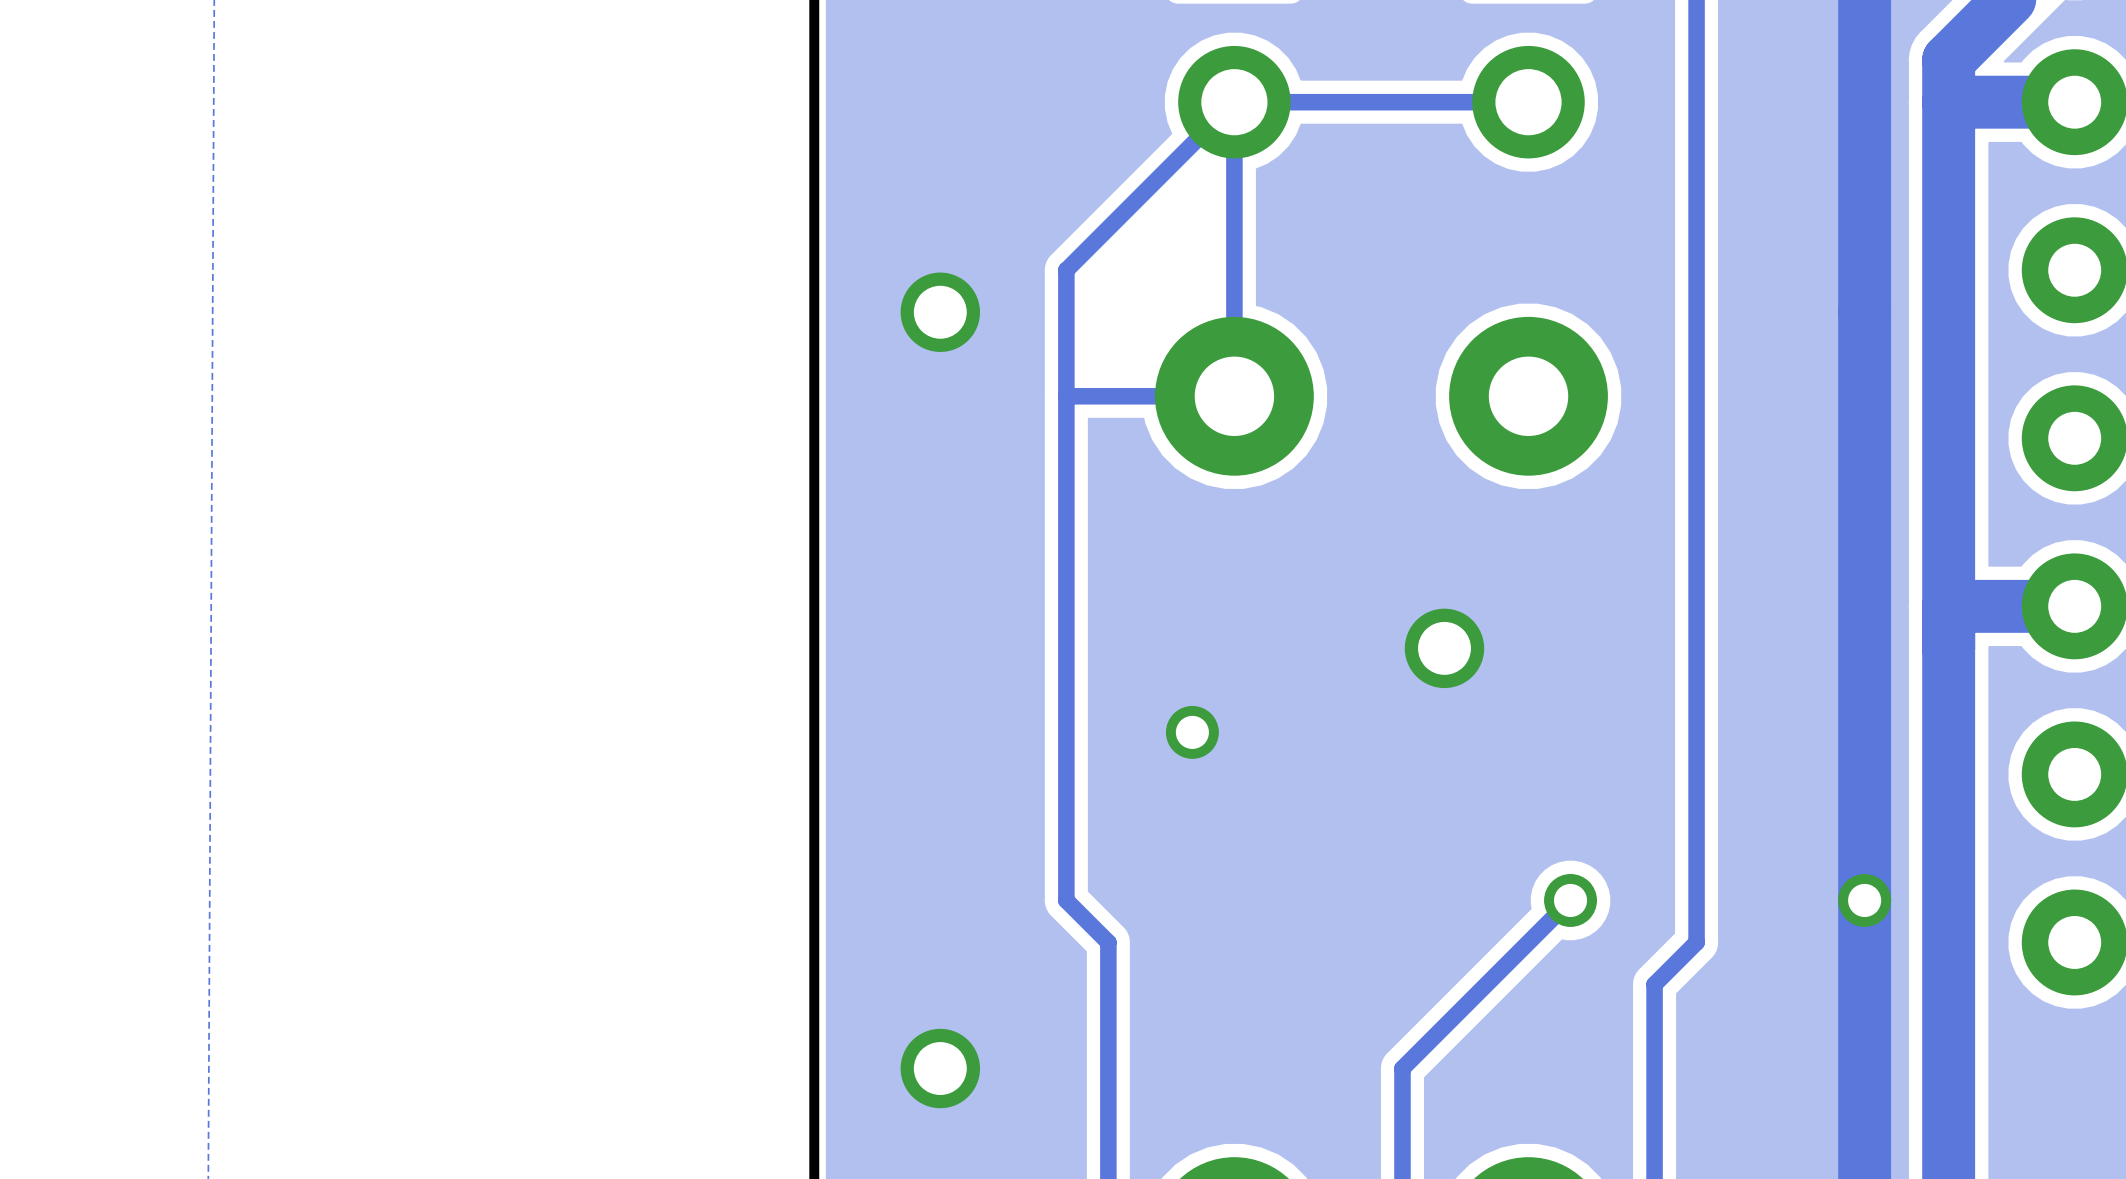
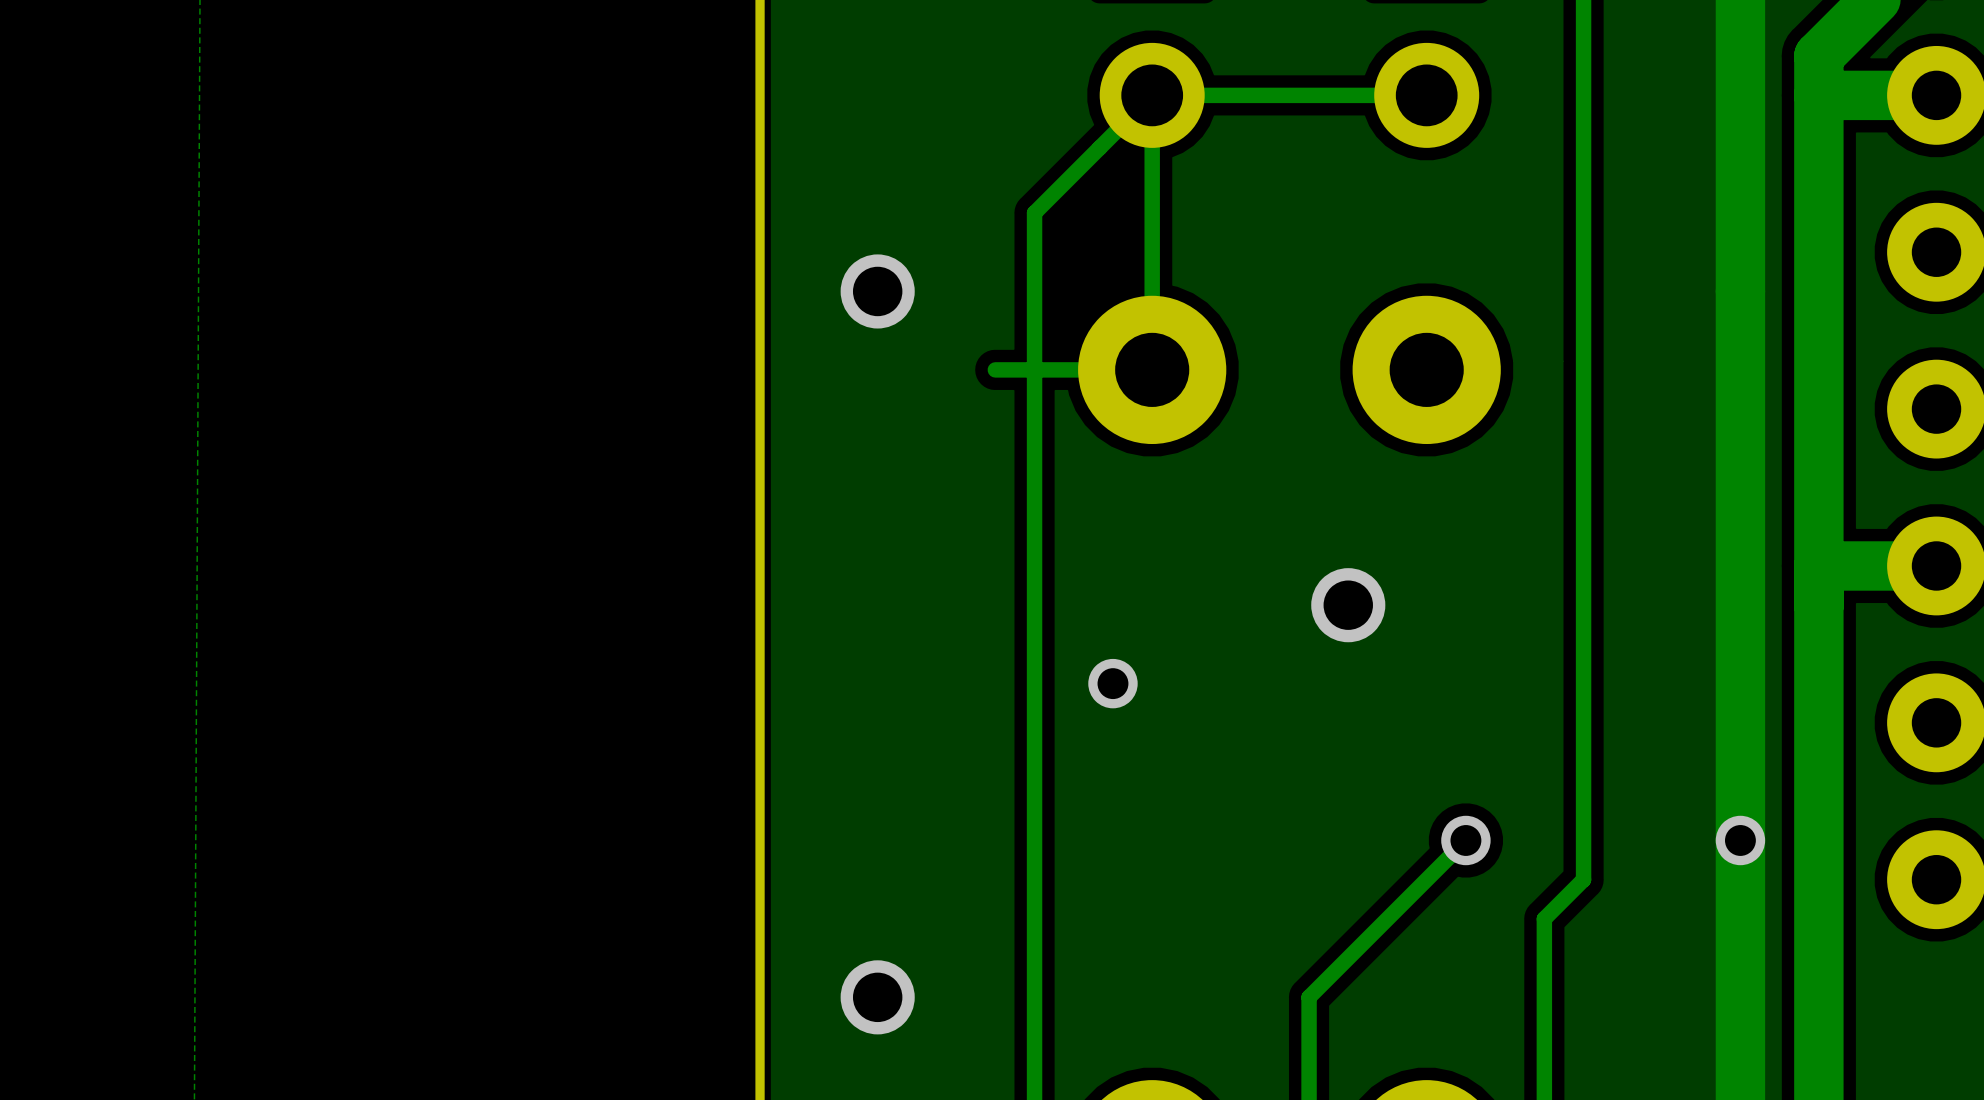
track: (1108, 228) (1066, 270) (1066, 900) (1108, 942) -> (1034, 213) (1034, 879)

